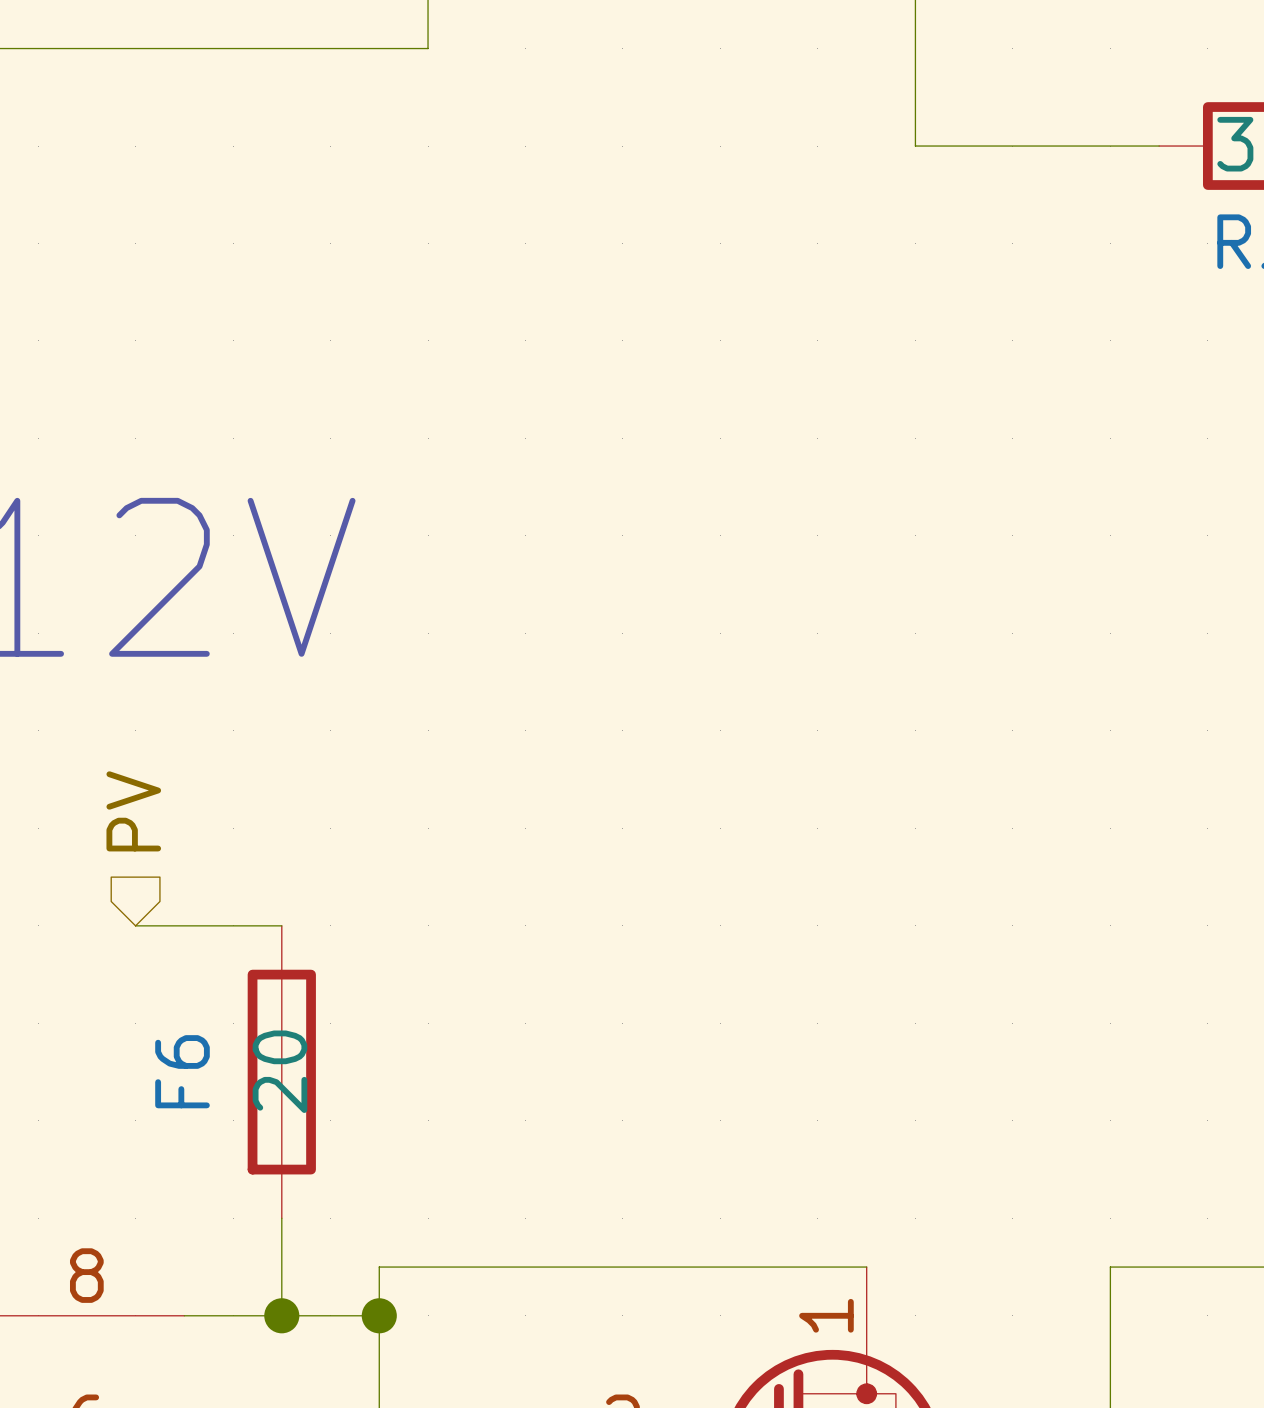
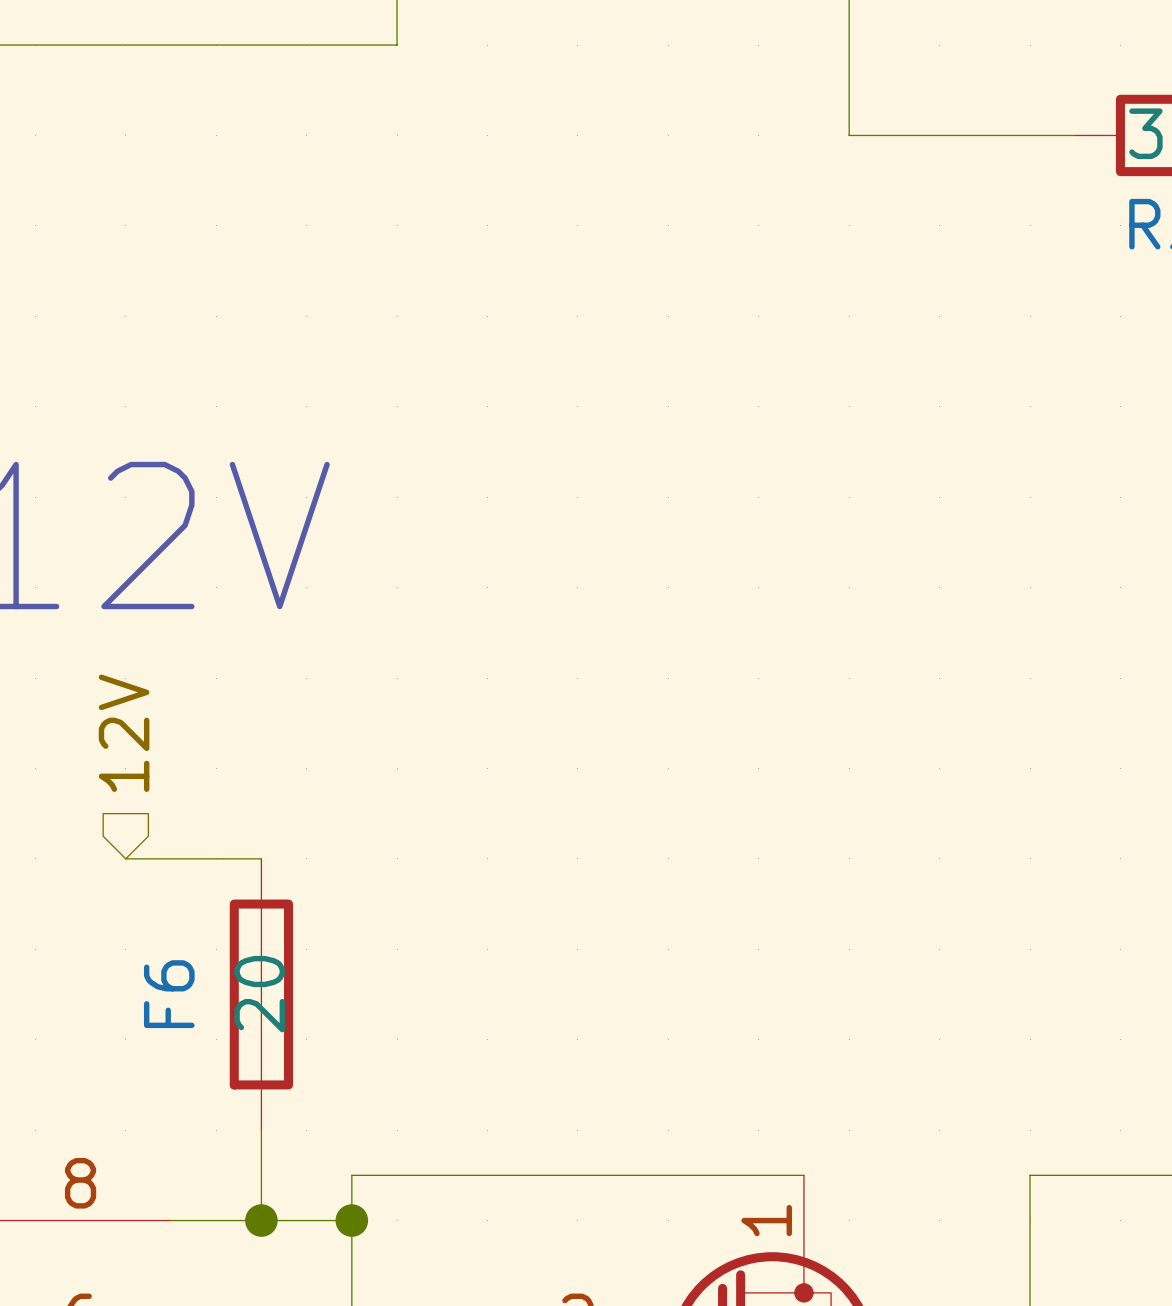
hierarchical label: PV (133, 811) -> 12V (124, 733)

